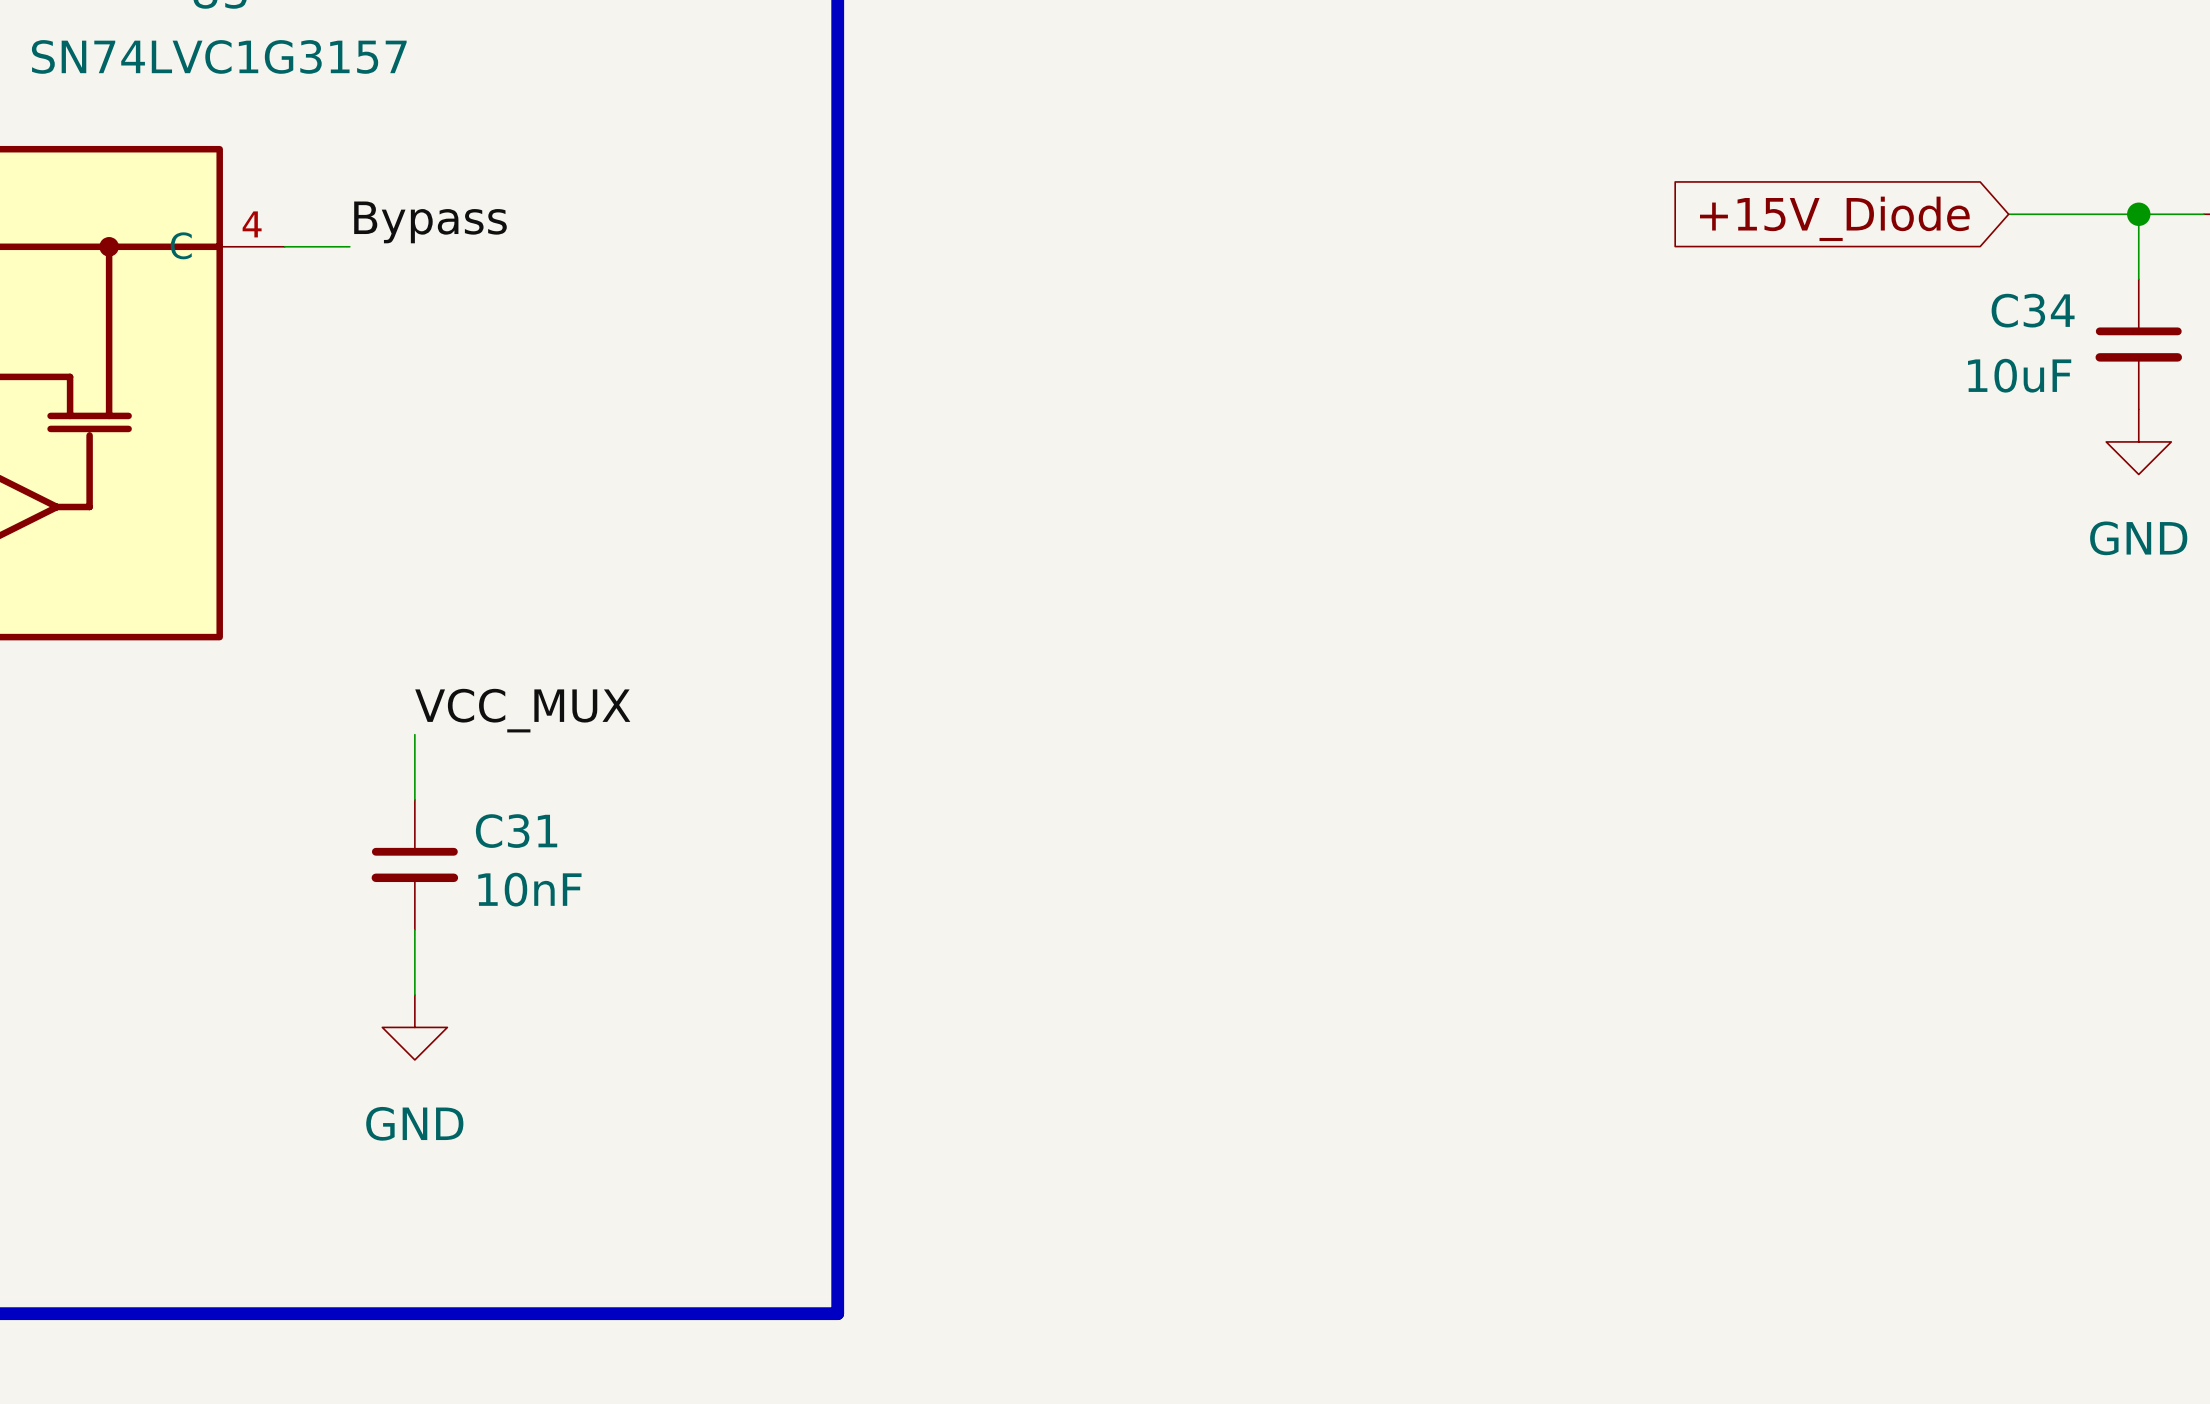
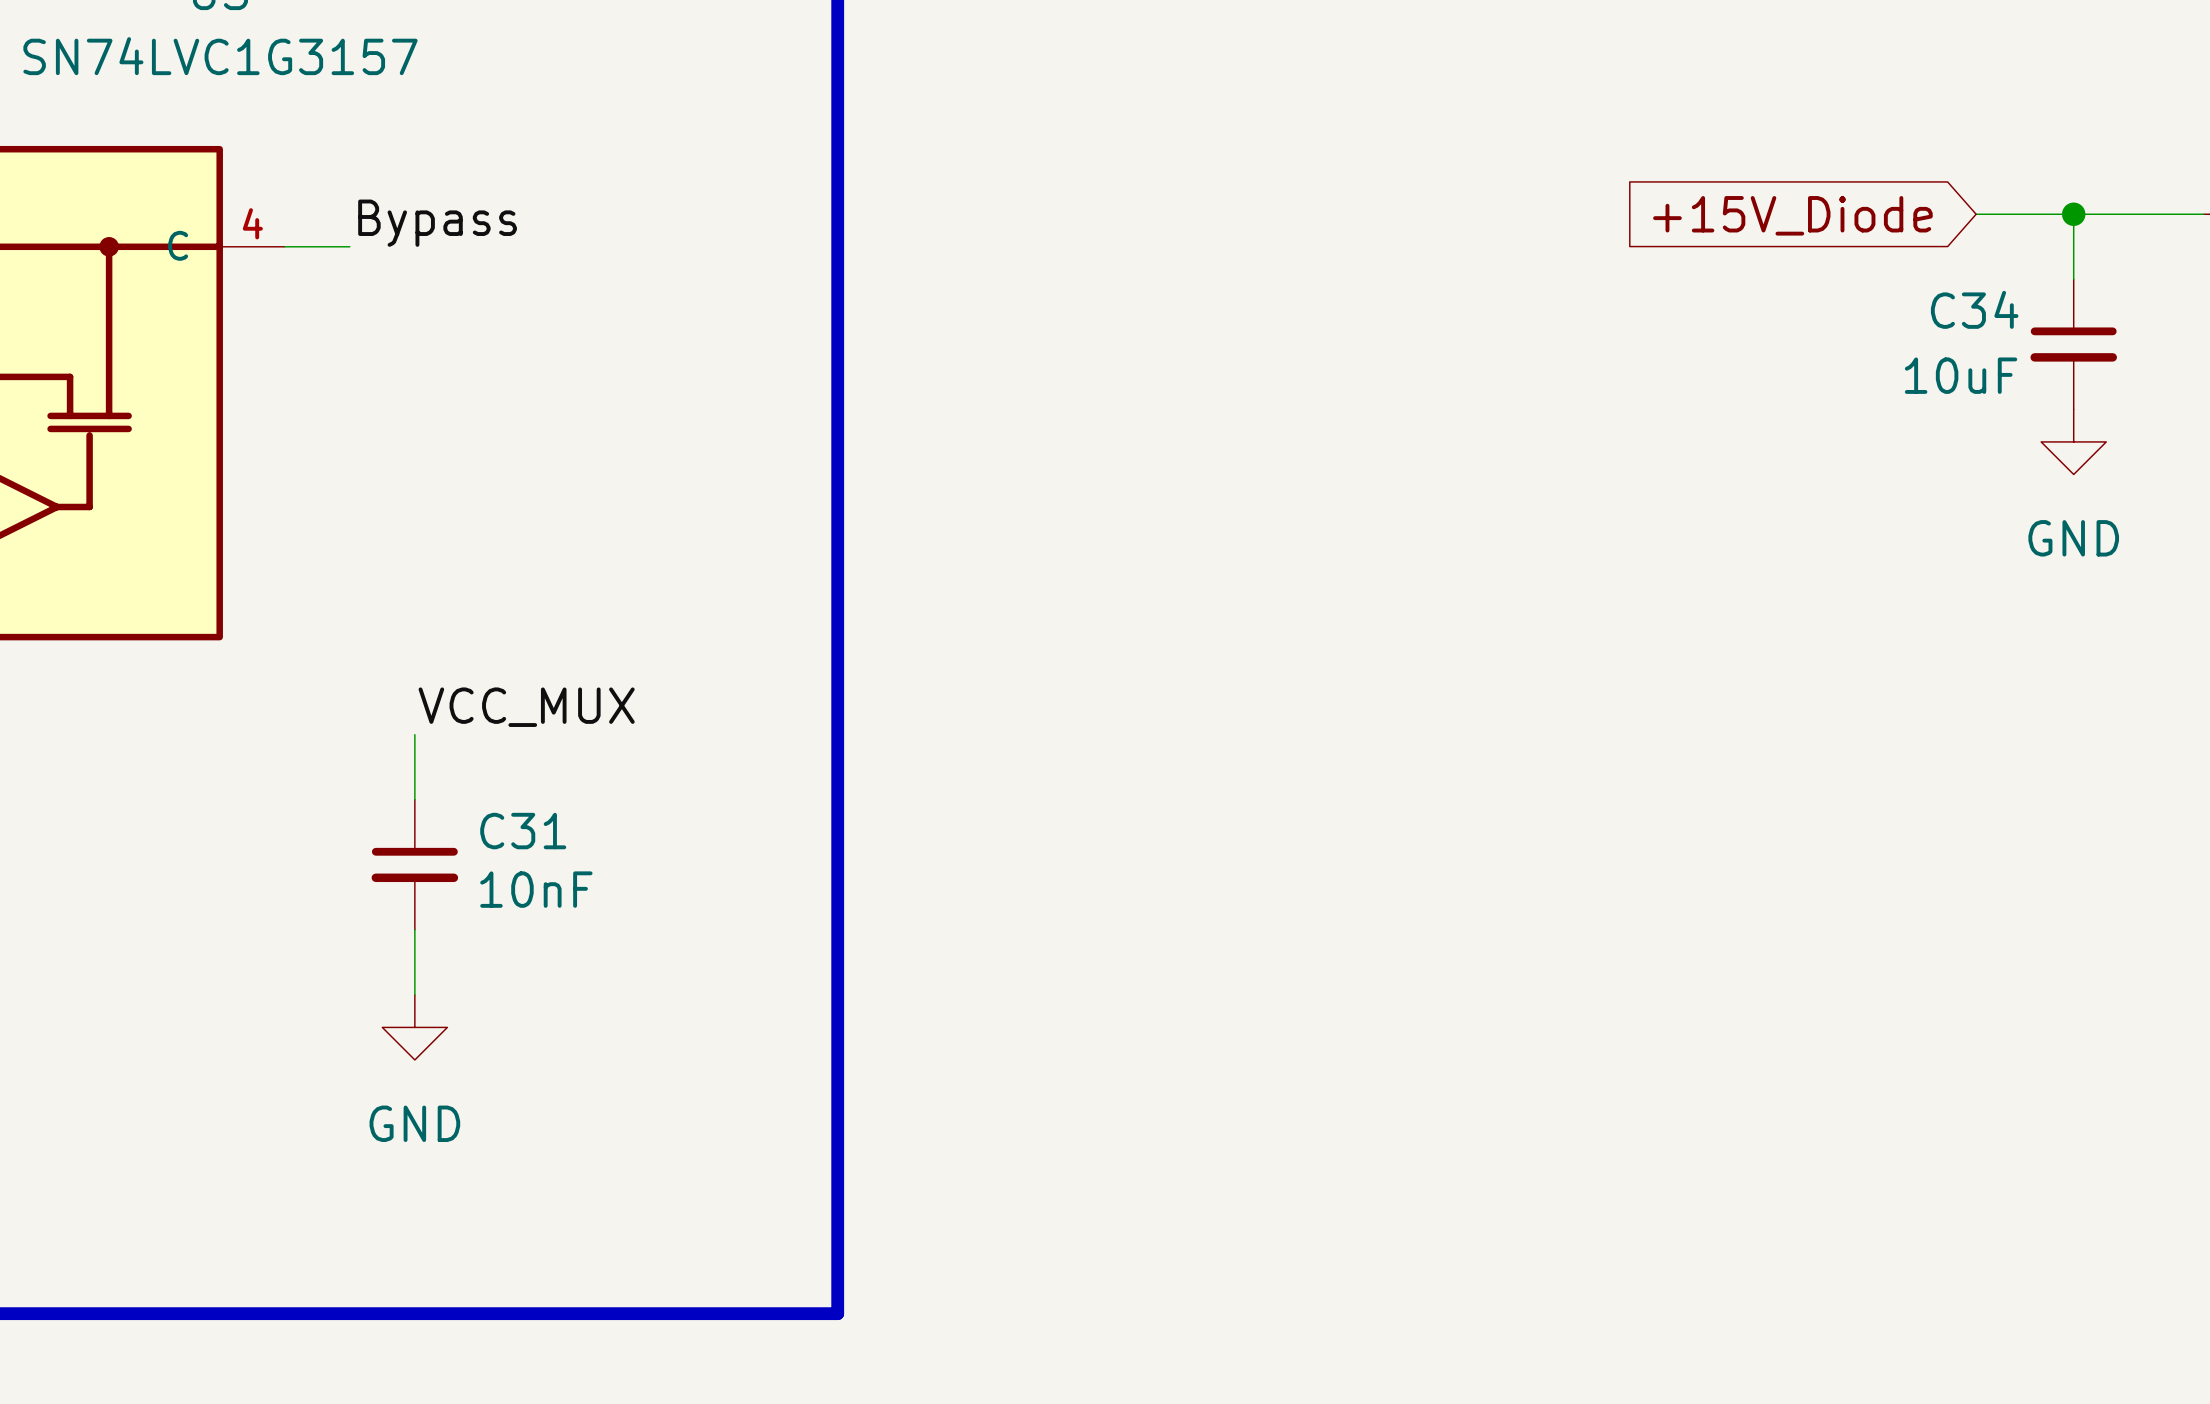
wire: none -> (1976, 214) (2008, 214)
wire: (2138, 214) (2138, 279) -> (2073, 214) (2073, 279)
junction position: (2138, 214) -> (2073, 214)
global label position: +15V_Diode (1834, 218) -> +15V_Diode (1792, 215)
C34 position: (2138, 344) -> (2073, 344)
power symbol position: GND (2138, 441) -> GND (2073, 441)

